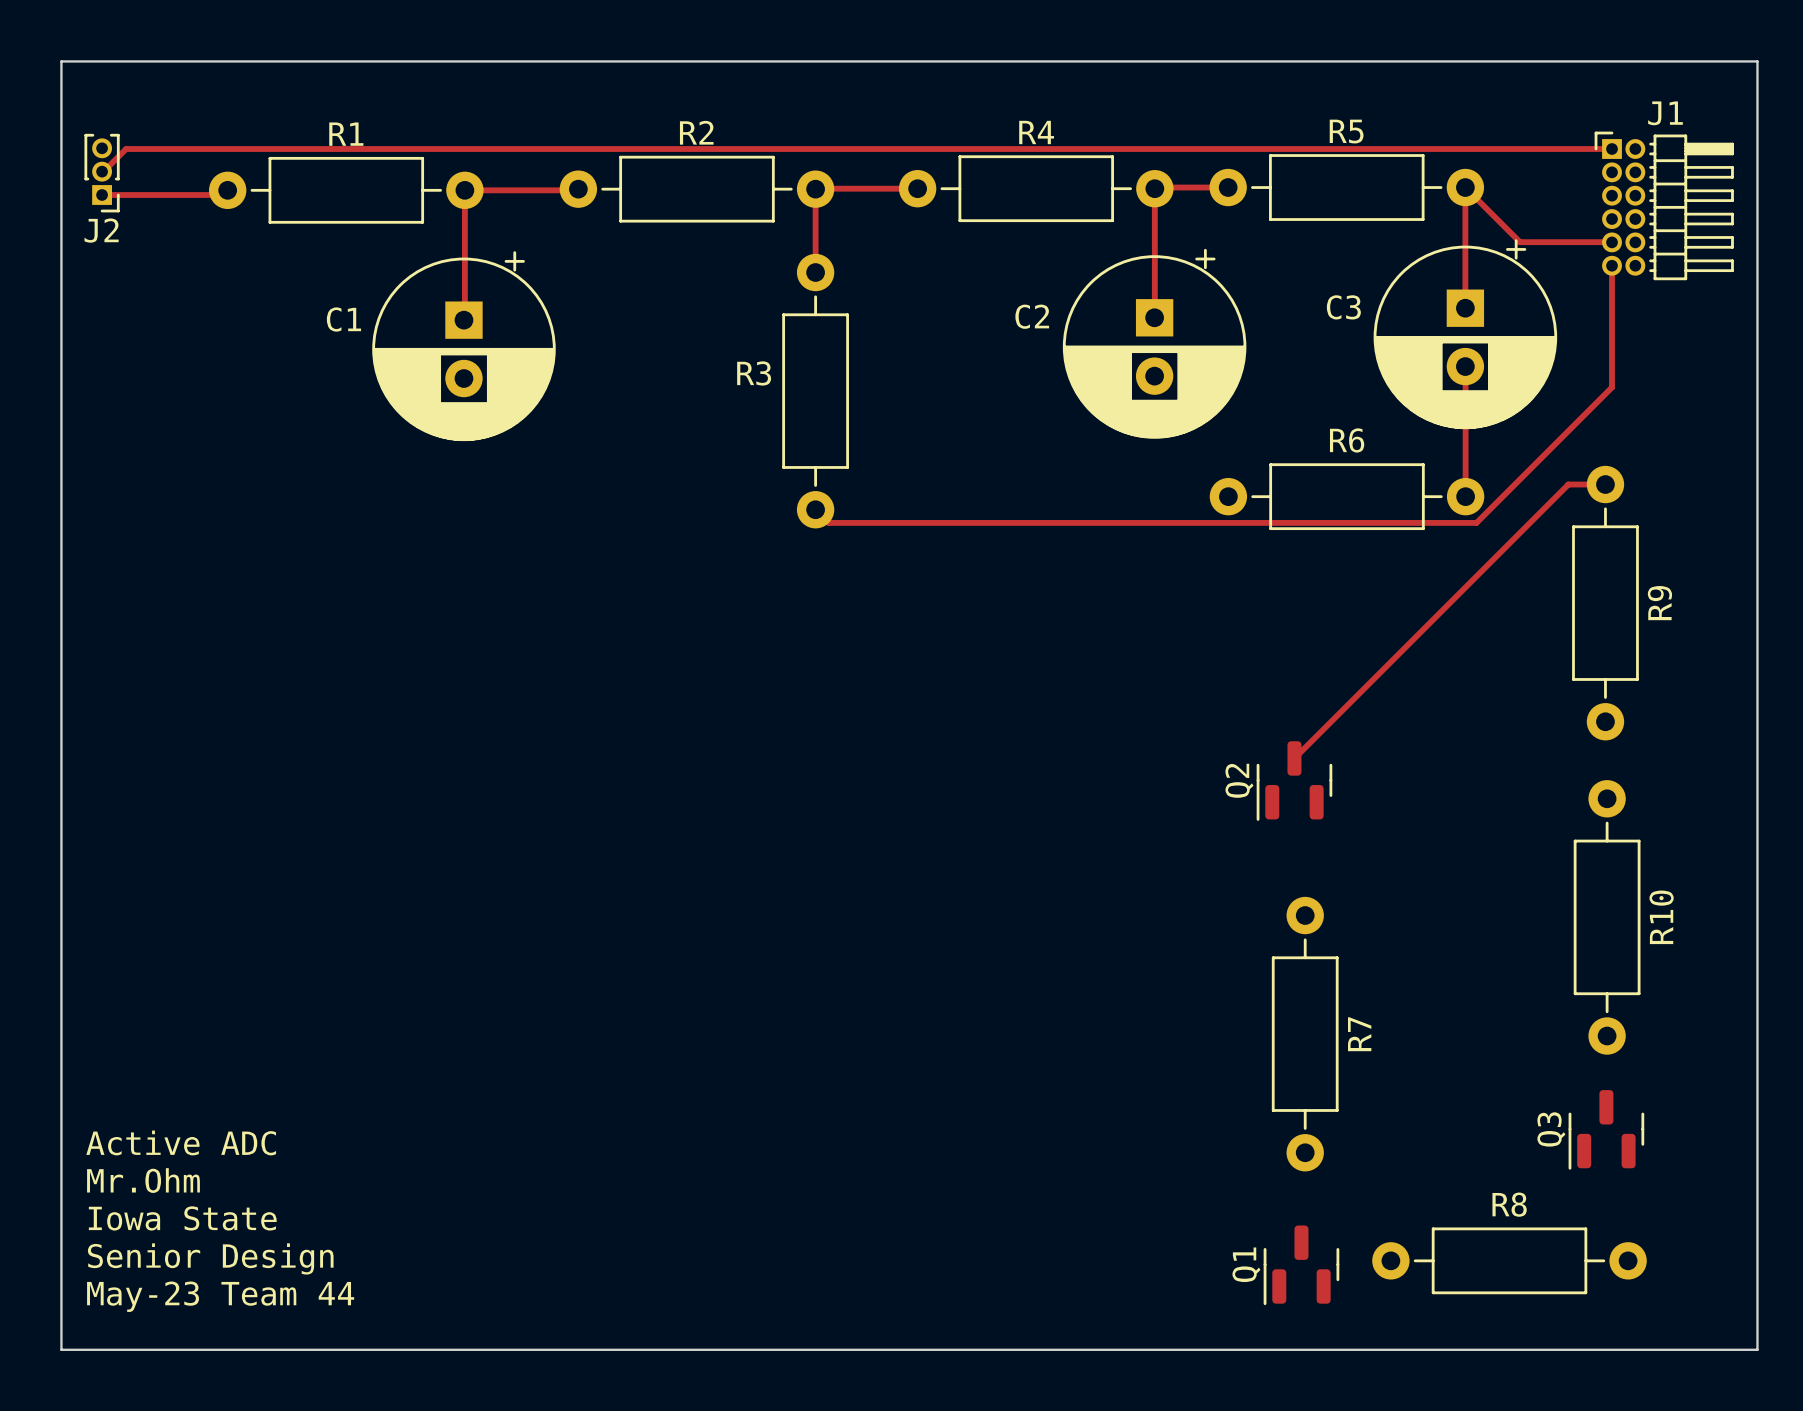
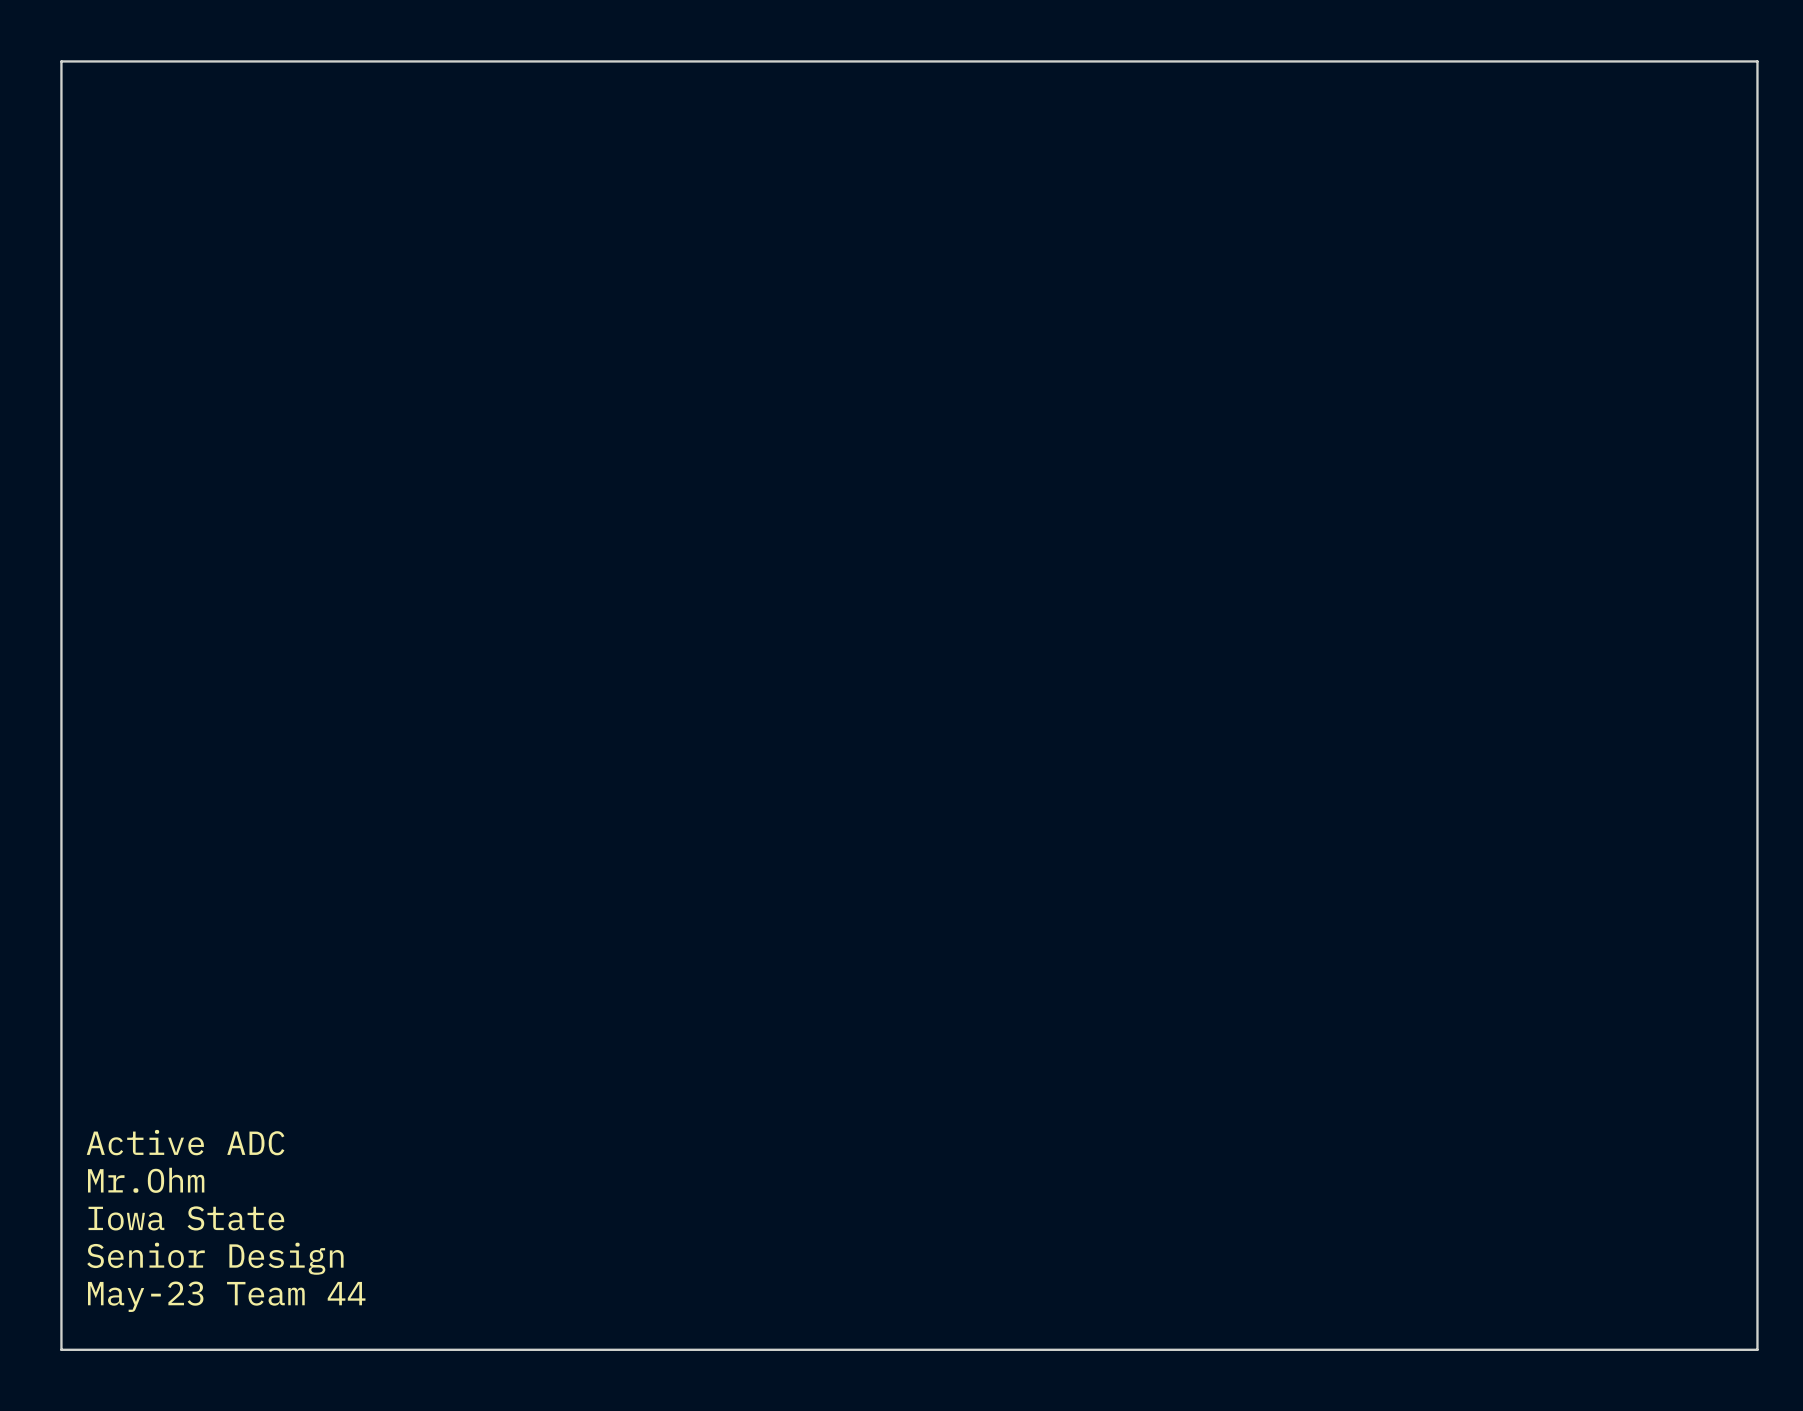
track: (1612, 149) (126, 149) (102, 171) -> none
J2: (102, 173) -> none
track: (1228, 187) (1154, 188) (1154, 317) -> none
R5: (1346, 187) -> none
track: (917, 188) (816, 188) (815, 272) -> none
R4: (1036, 188) -> none
track: (578, 189) (464, 190) (463, 320) -> none
R2: (696, 189) -> none
track: (227, 190) (223, 195) (102, 195) -> none
R1: (346, 190) -> none
J1: (1664, 205) -> none
track: (1617, 242) (1520, 242) (1465, 187) (1465, 308) -> none
track: (1612, 265) (1612, 387) (1476, 522) (828, 522) (815, 509) -> none
C3: (1465, 334) -> none
C2: (1154, 343) -> none
C1: (463, 346) -> none
track: (1465, 366) (1465, 496) -> none
R3: (815, 391) -> none
track: (1605, 484) (1568, 484) (1294, 758) -> none
R6: (1347, 496) -> none
R9: (1605, 603) -> none
Q2: (1294, 781) -> none
R10: (1607, 917) -> none
R7: (1305, 1034) -> none
Q3: (1606, 1129) -> none
R8: (1509, 1260) -> none
Q1: (1301, 1265) -> none

